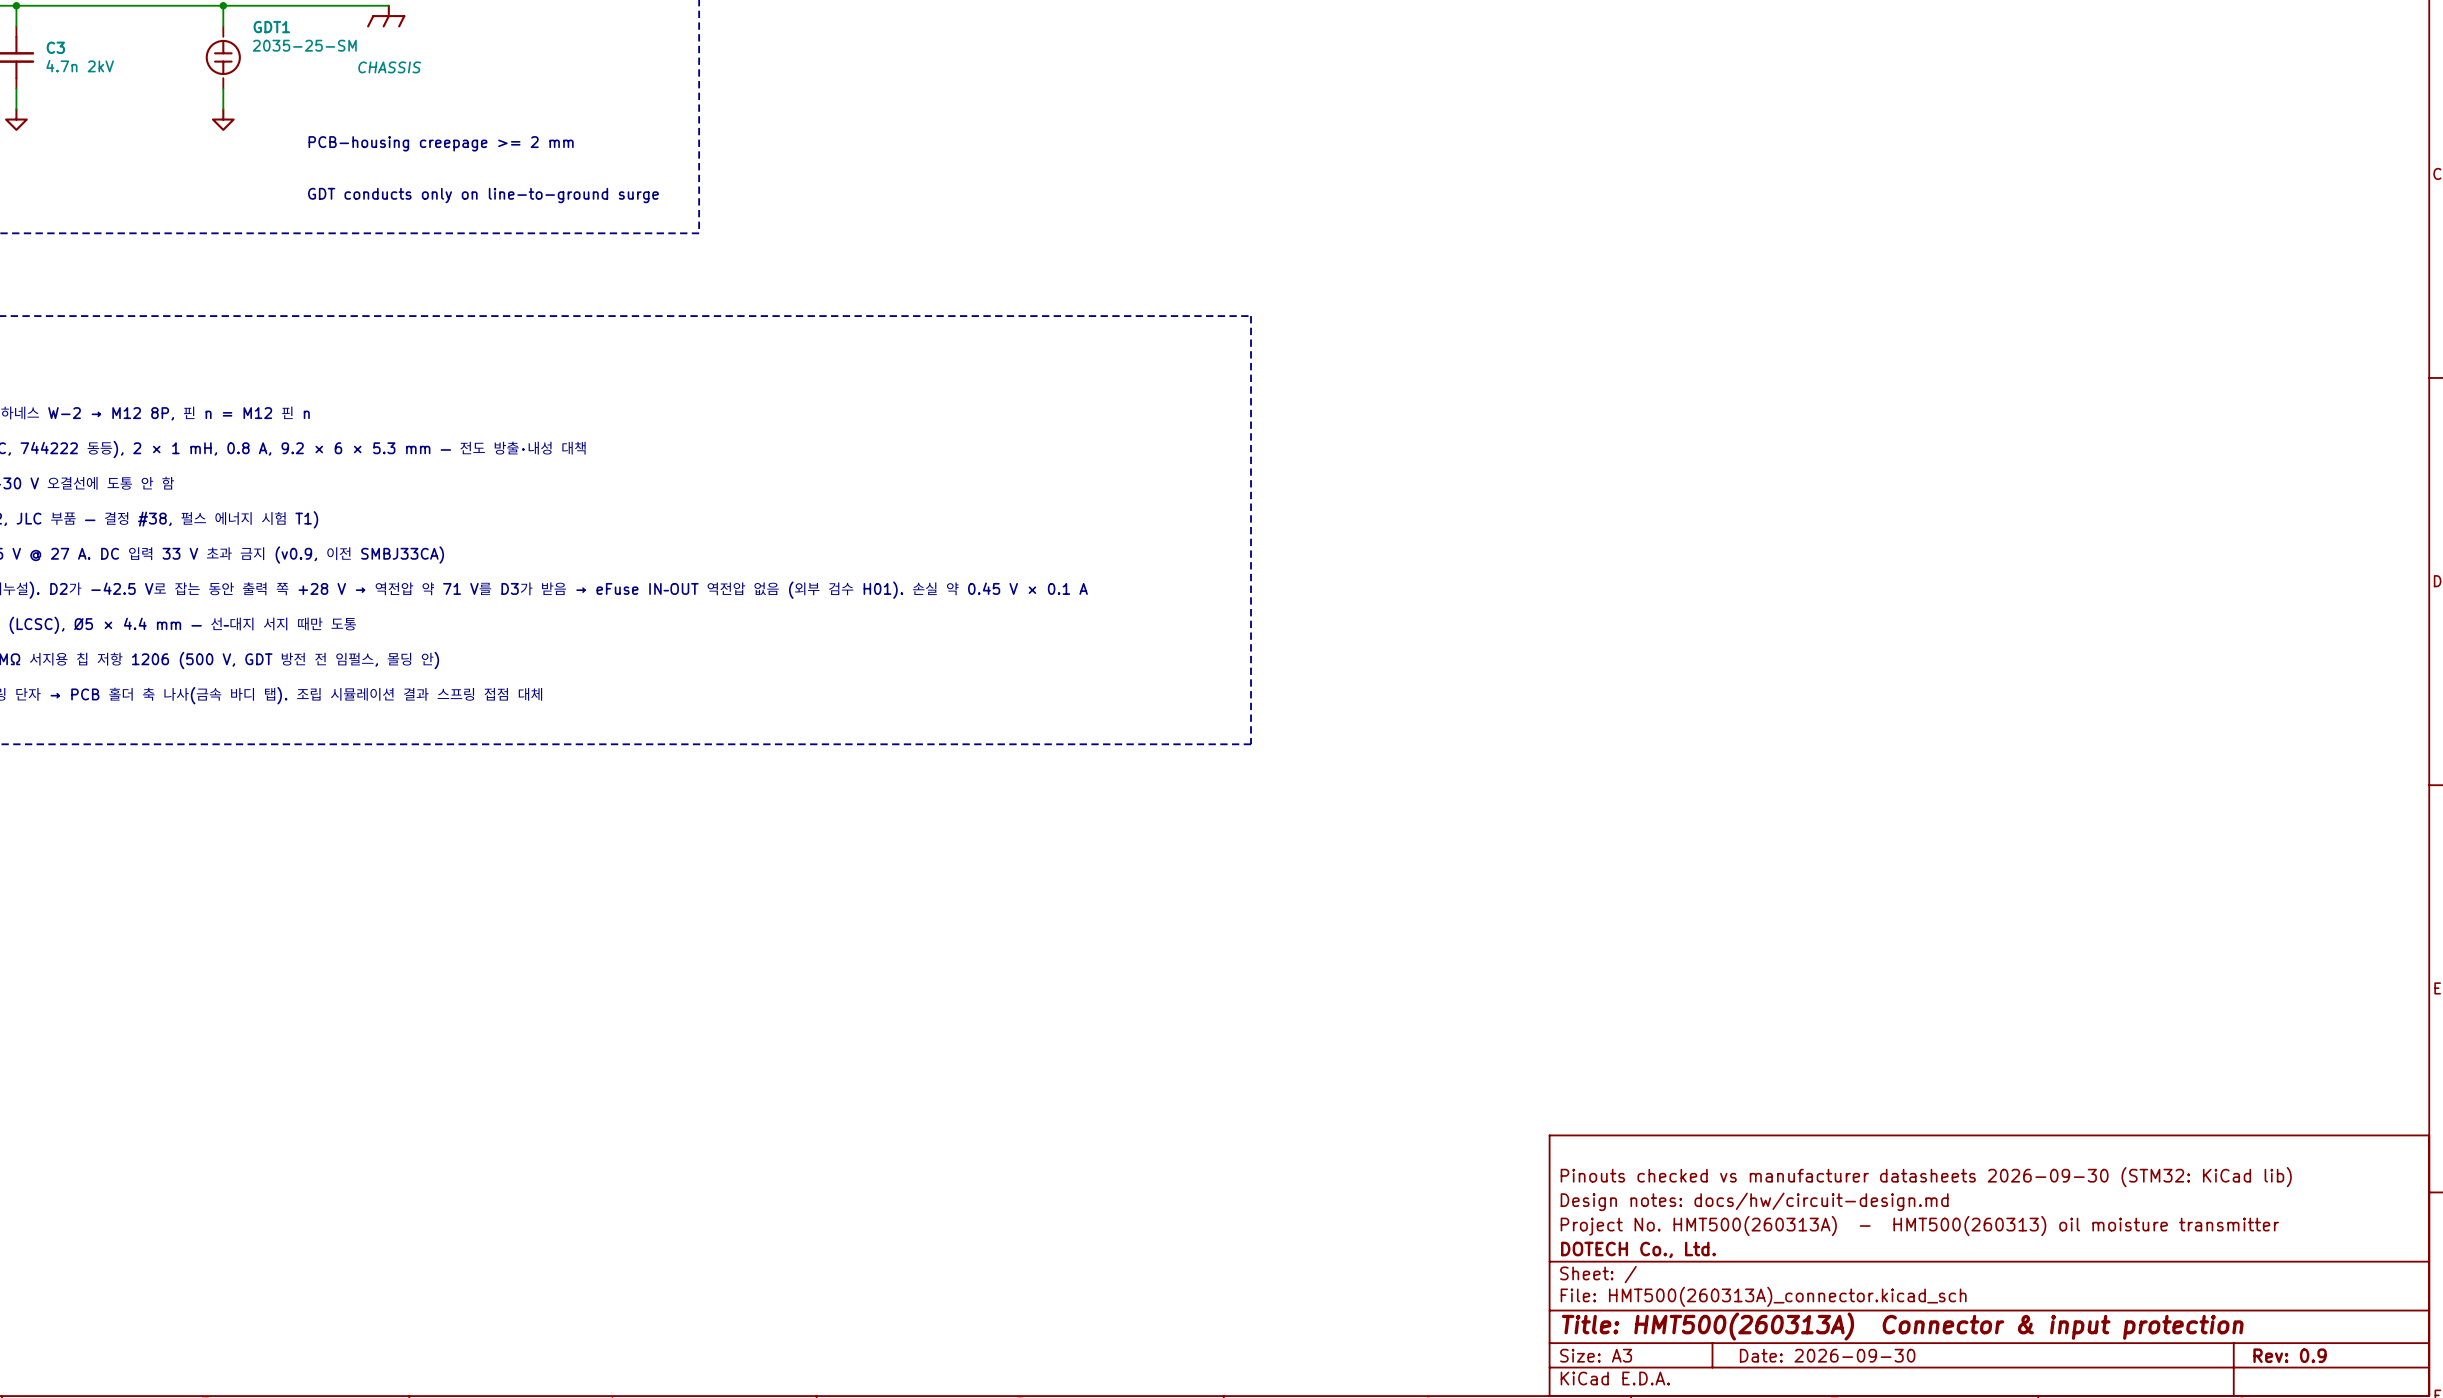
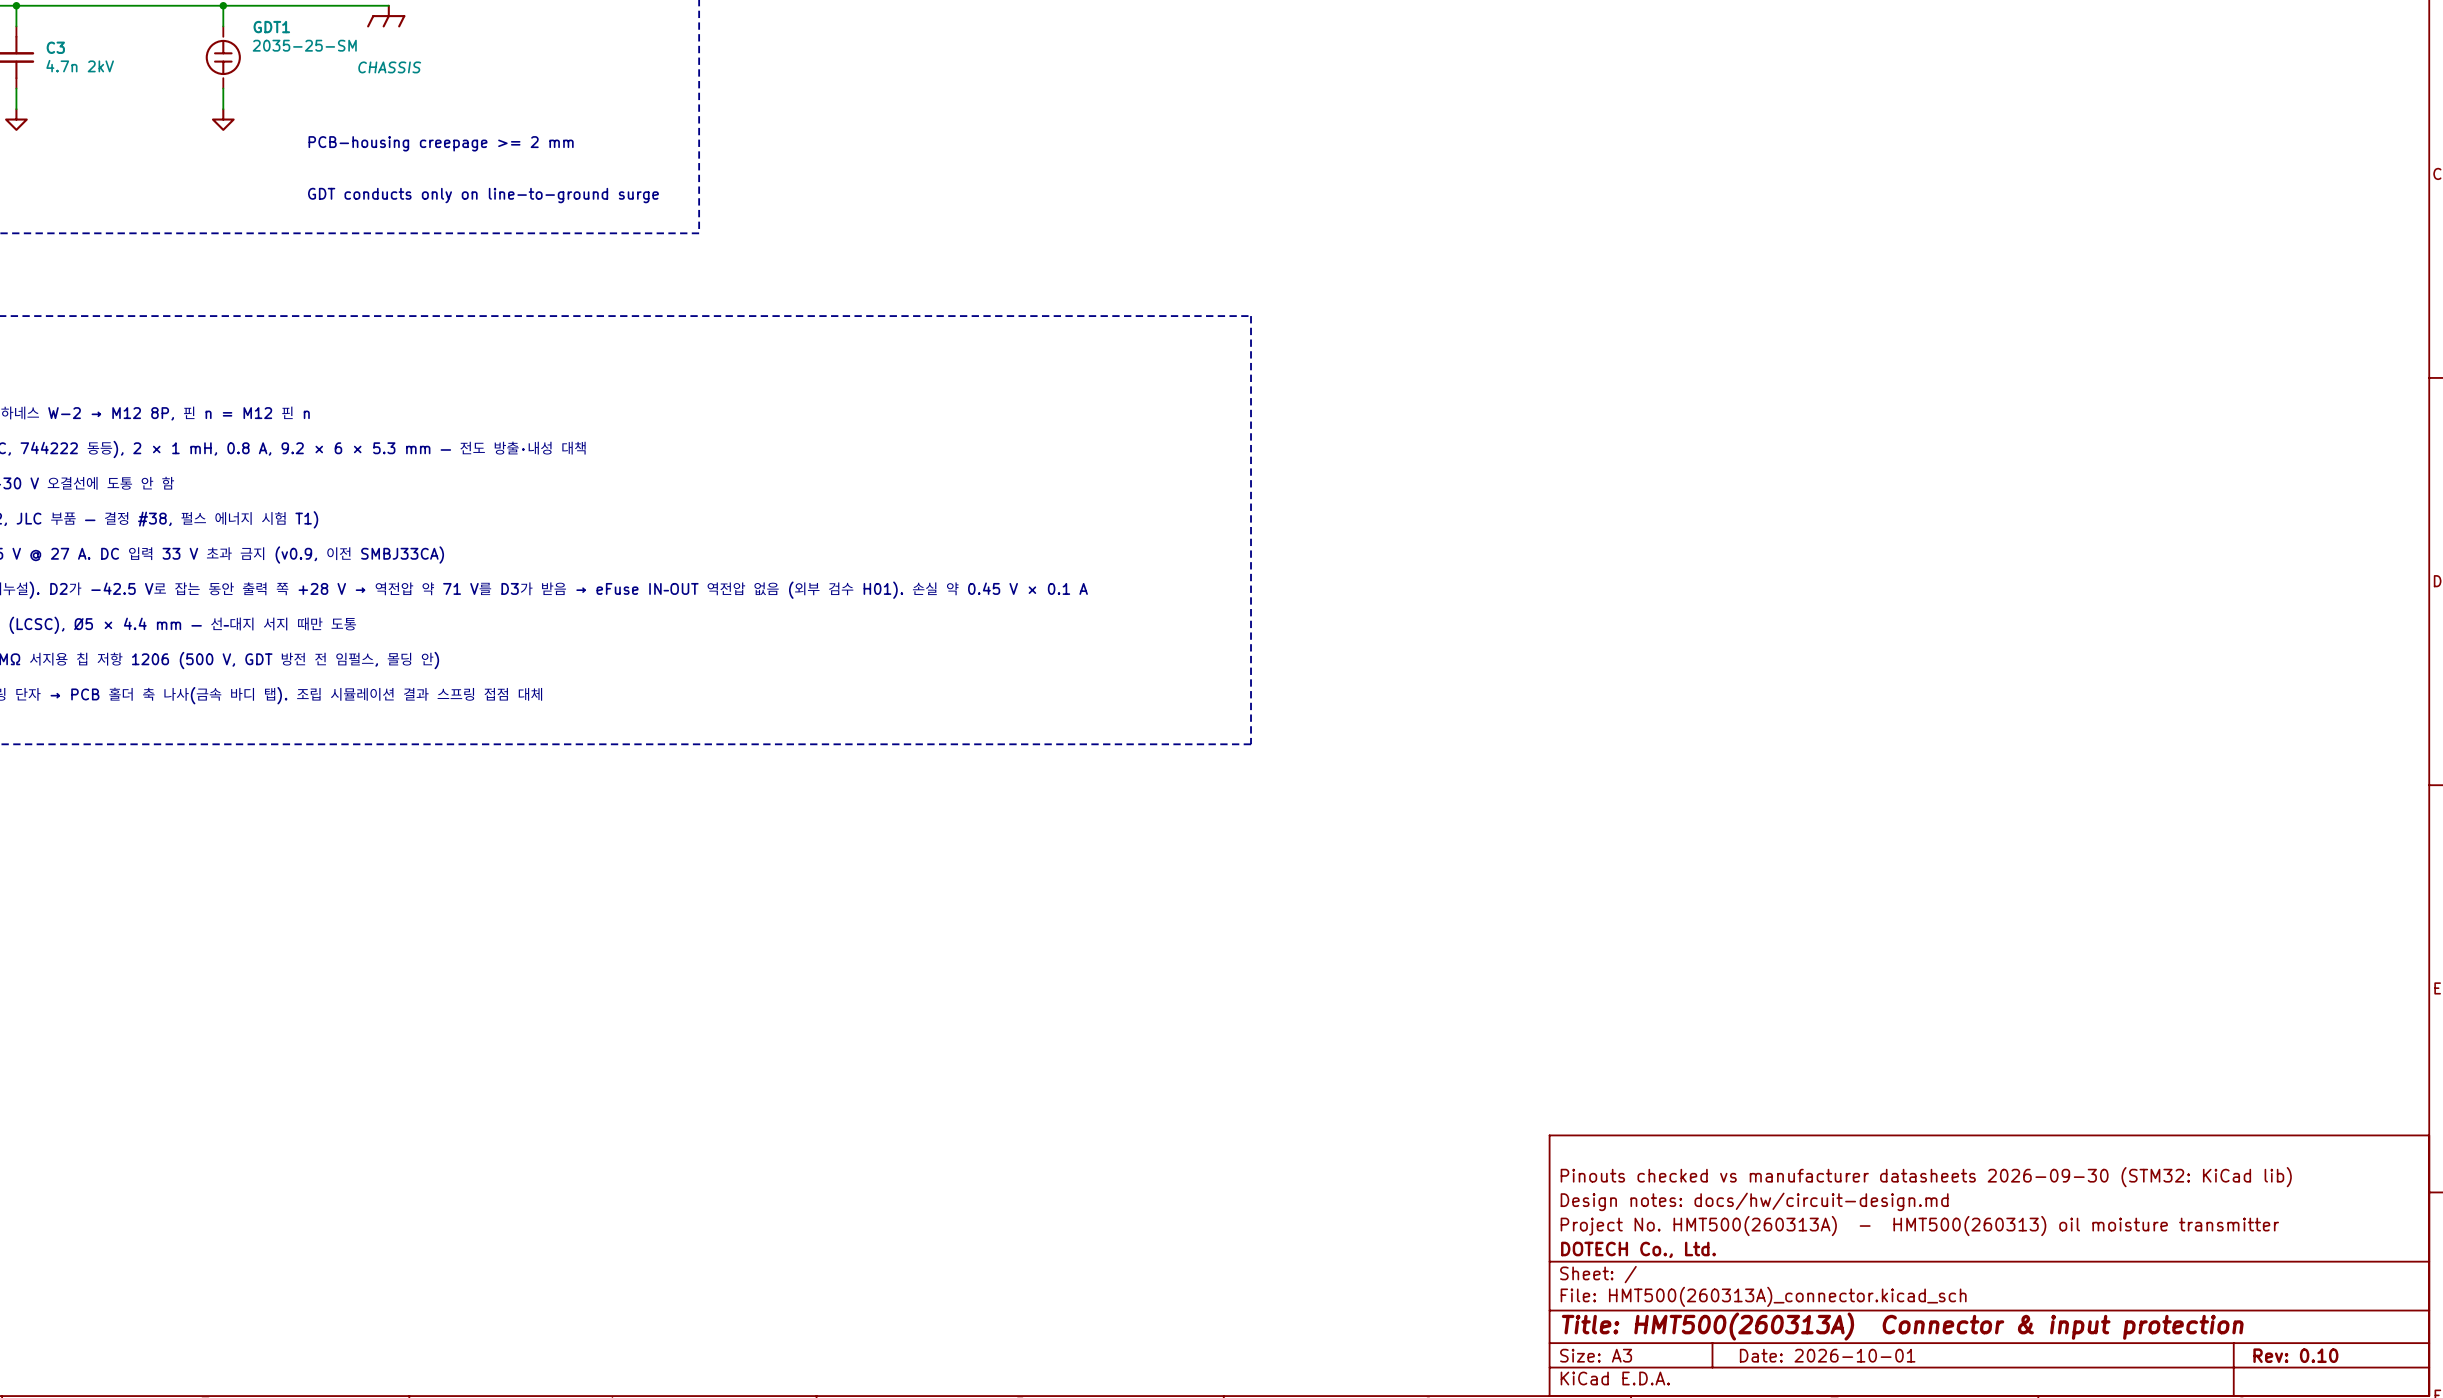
title block: Date: 2026-09-30 (1827, 1355) -> Date: 2026-10-01 (1827, 1355)
title block: Rev: 0.9 (2290, 1355) -> Rev: 0.10 (2295, 1355)

